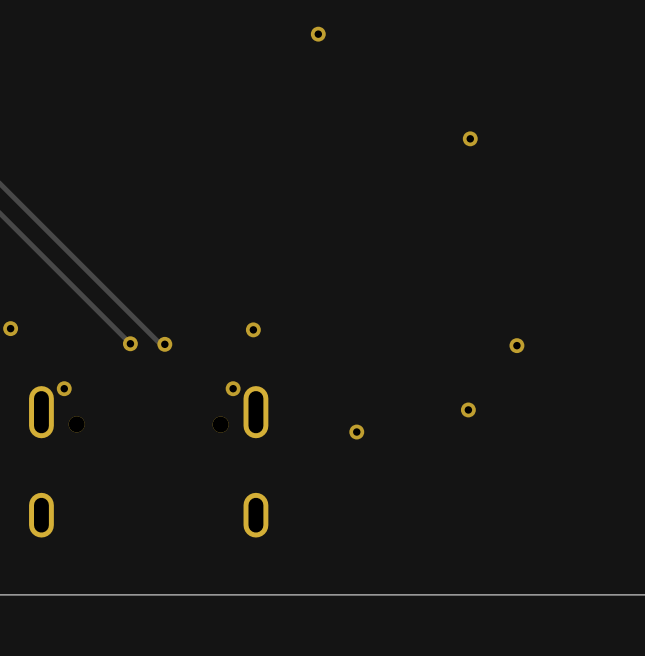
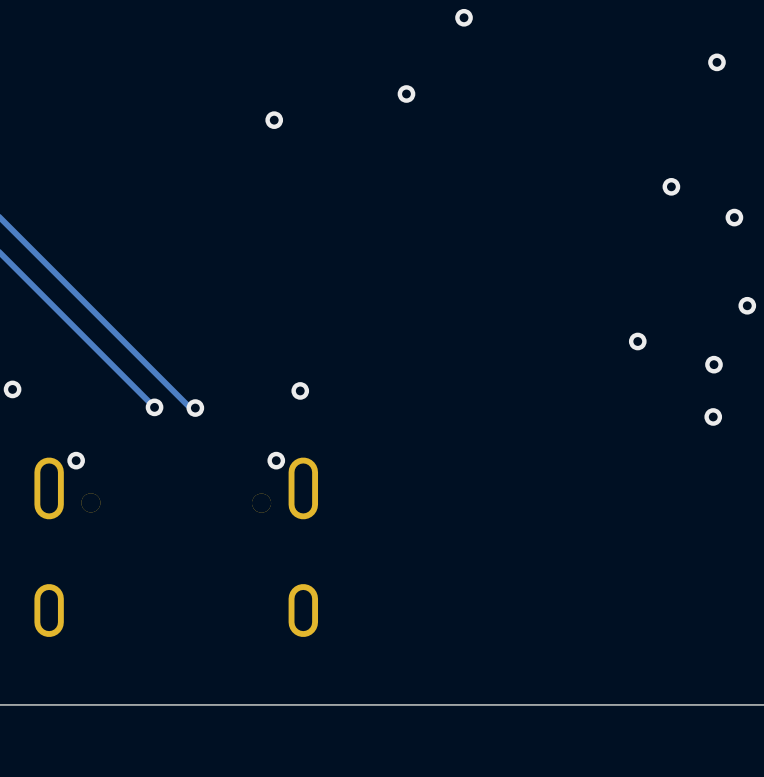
via: none -> (464, 17)
via: (318, 34) -> none
via: none -> (716, 62)
via: none -> (406, 93)
via: none -> (274, 120)
via: (470, 138) -> none
via: none -> (671, 186)
via: none -> (734, 217)
via: none -> (747, 305)
via: none -> (637, 341)
via: none -> (713, 364)
via: (516, 345) -> none
via: none -> (713, 416)
via: (468, 409) -> none
via: (356, 432) -> none

